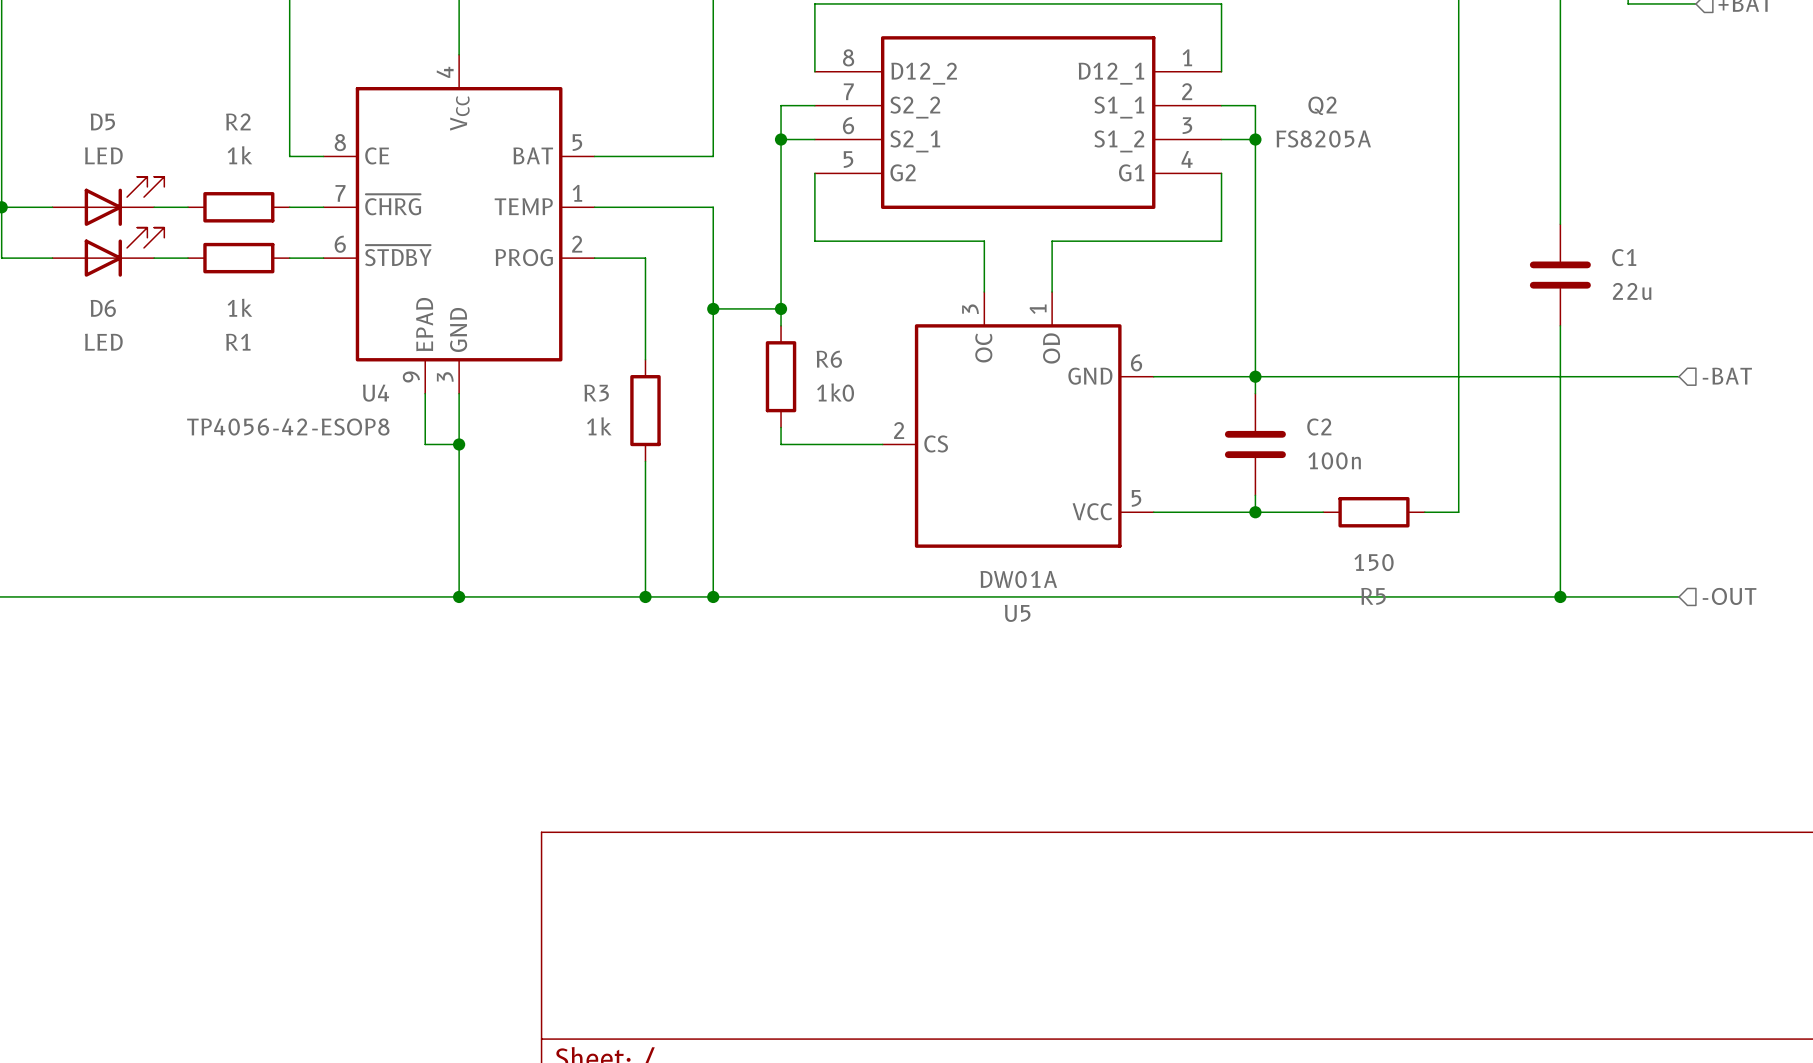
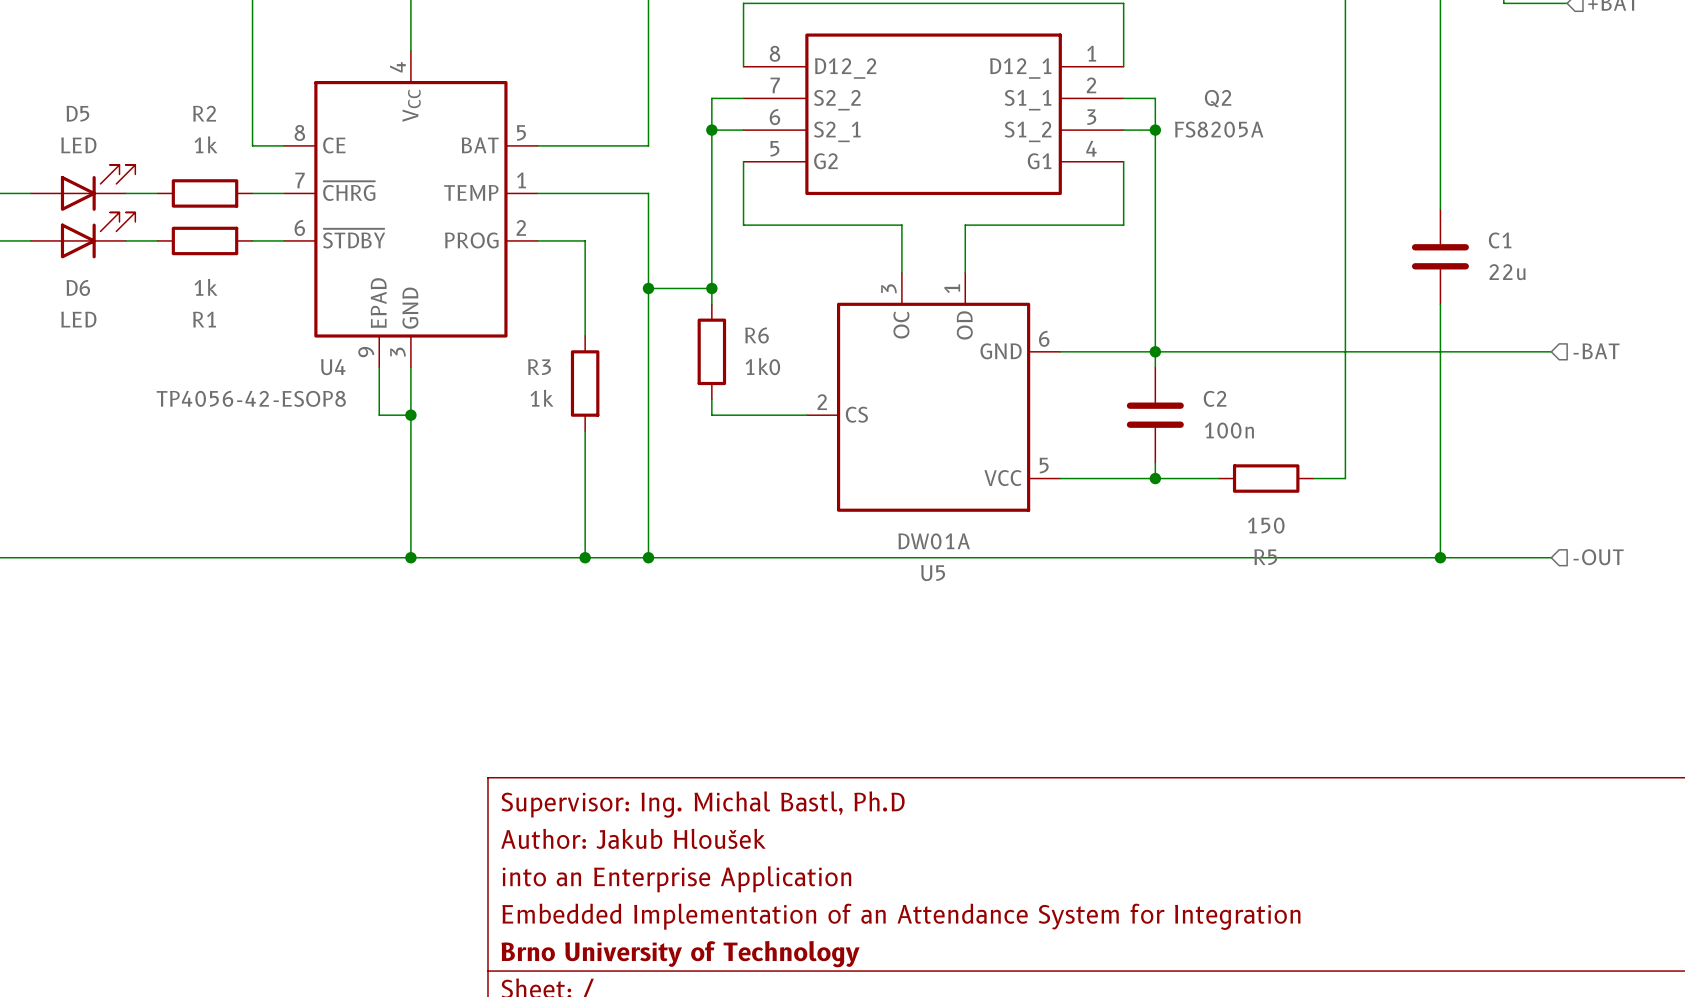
title block: none -> Supervisor: Ing. Michal Bastl, Ph.D (703, 804)
title block: none -> Author: Jakub Hloušek (633, 838)
title block: none -> into an Enterprise Application (677, 879)
title block: none -> Embedded Implementation of an Attendance System for Integration (901, 916)
title block: none -> Brno University of Technology (680, 954)

